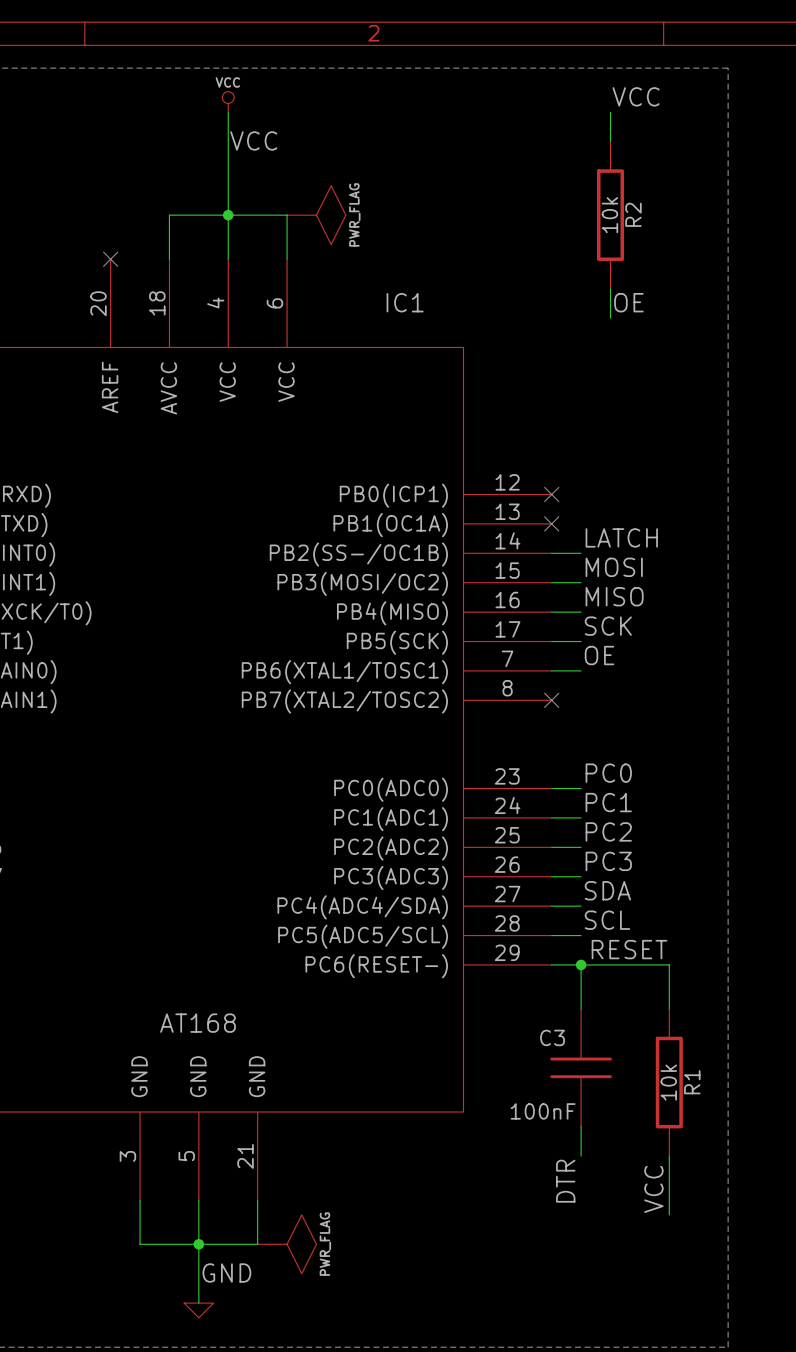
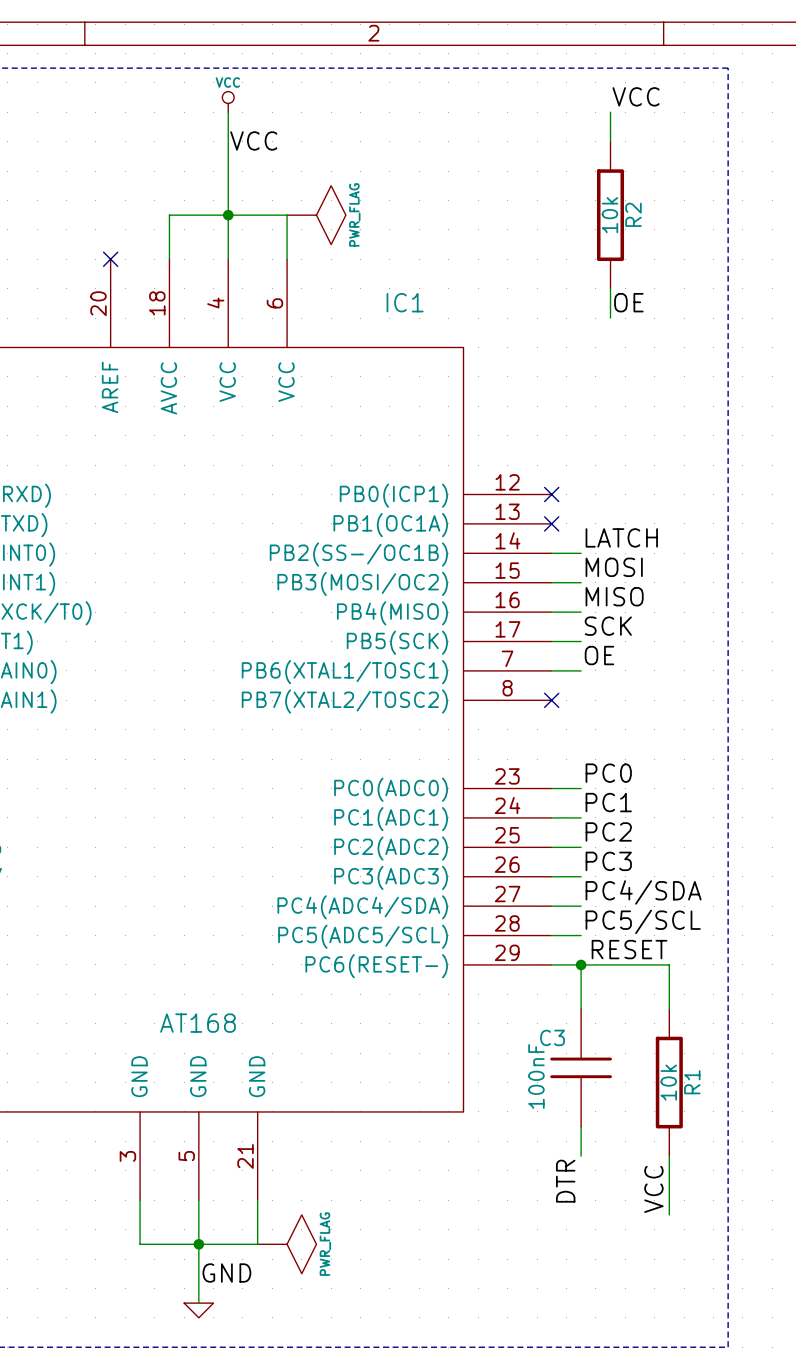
label: SDA (607, 890) -> PC4/SDA (643, 892)
label: SCL (607, 920) -> PC5/SCL (643, 921)
C3 value rotation: 0° (543, 1111) -> 90° counterclockwise (536, 1076)

